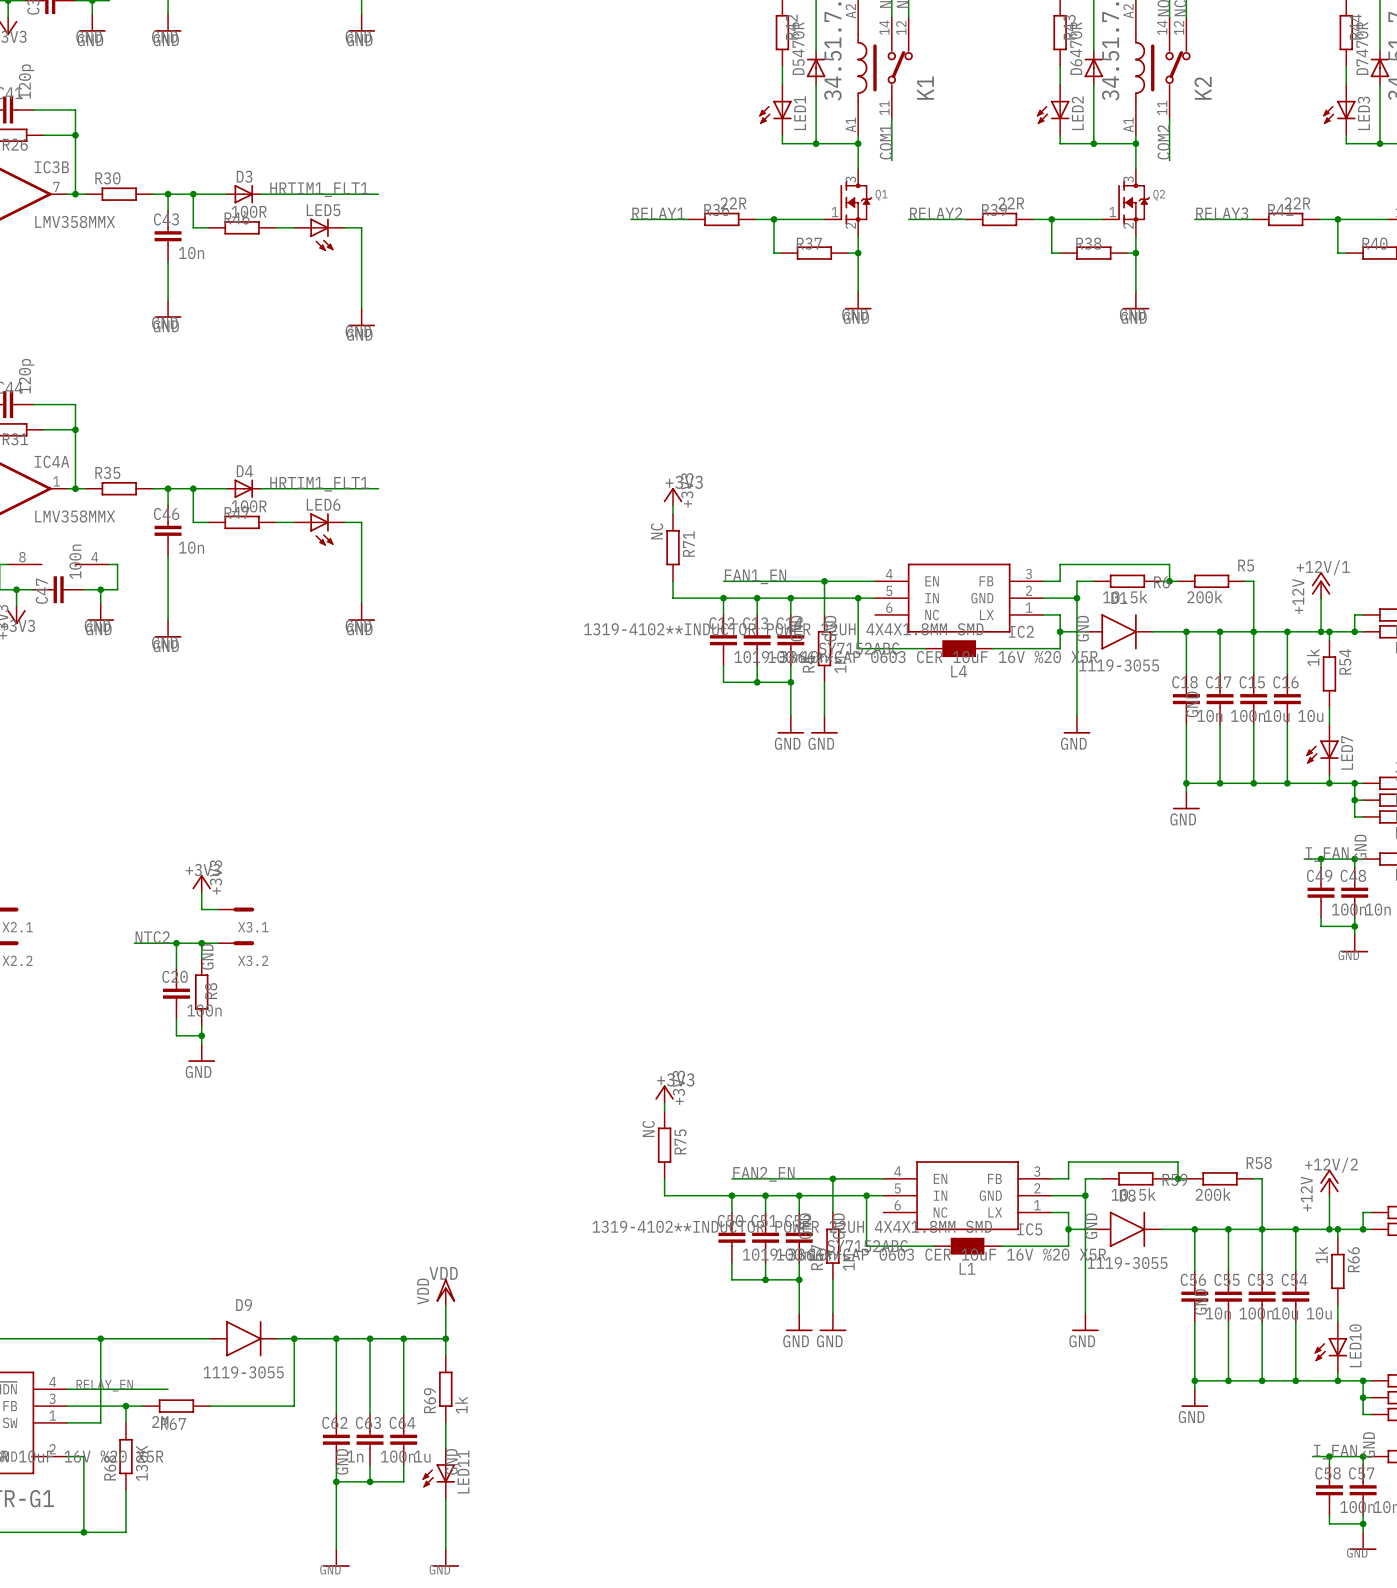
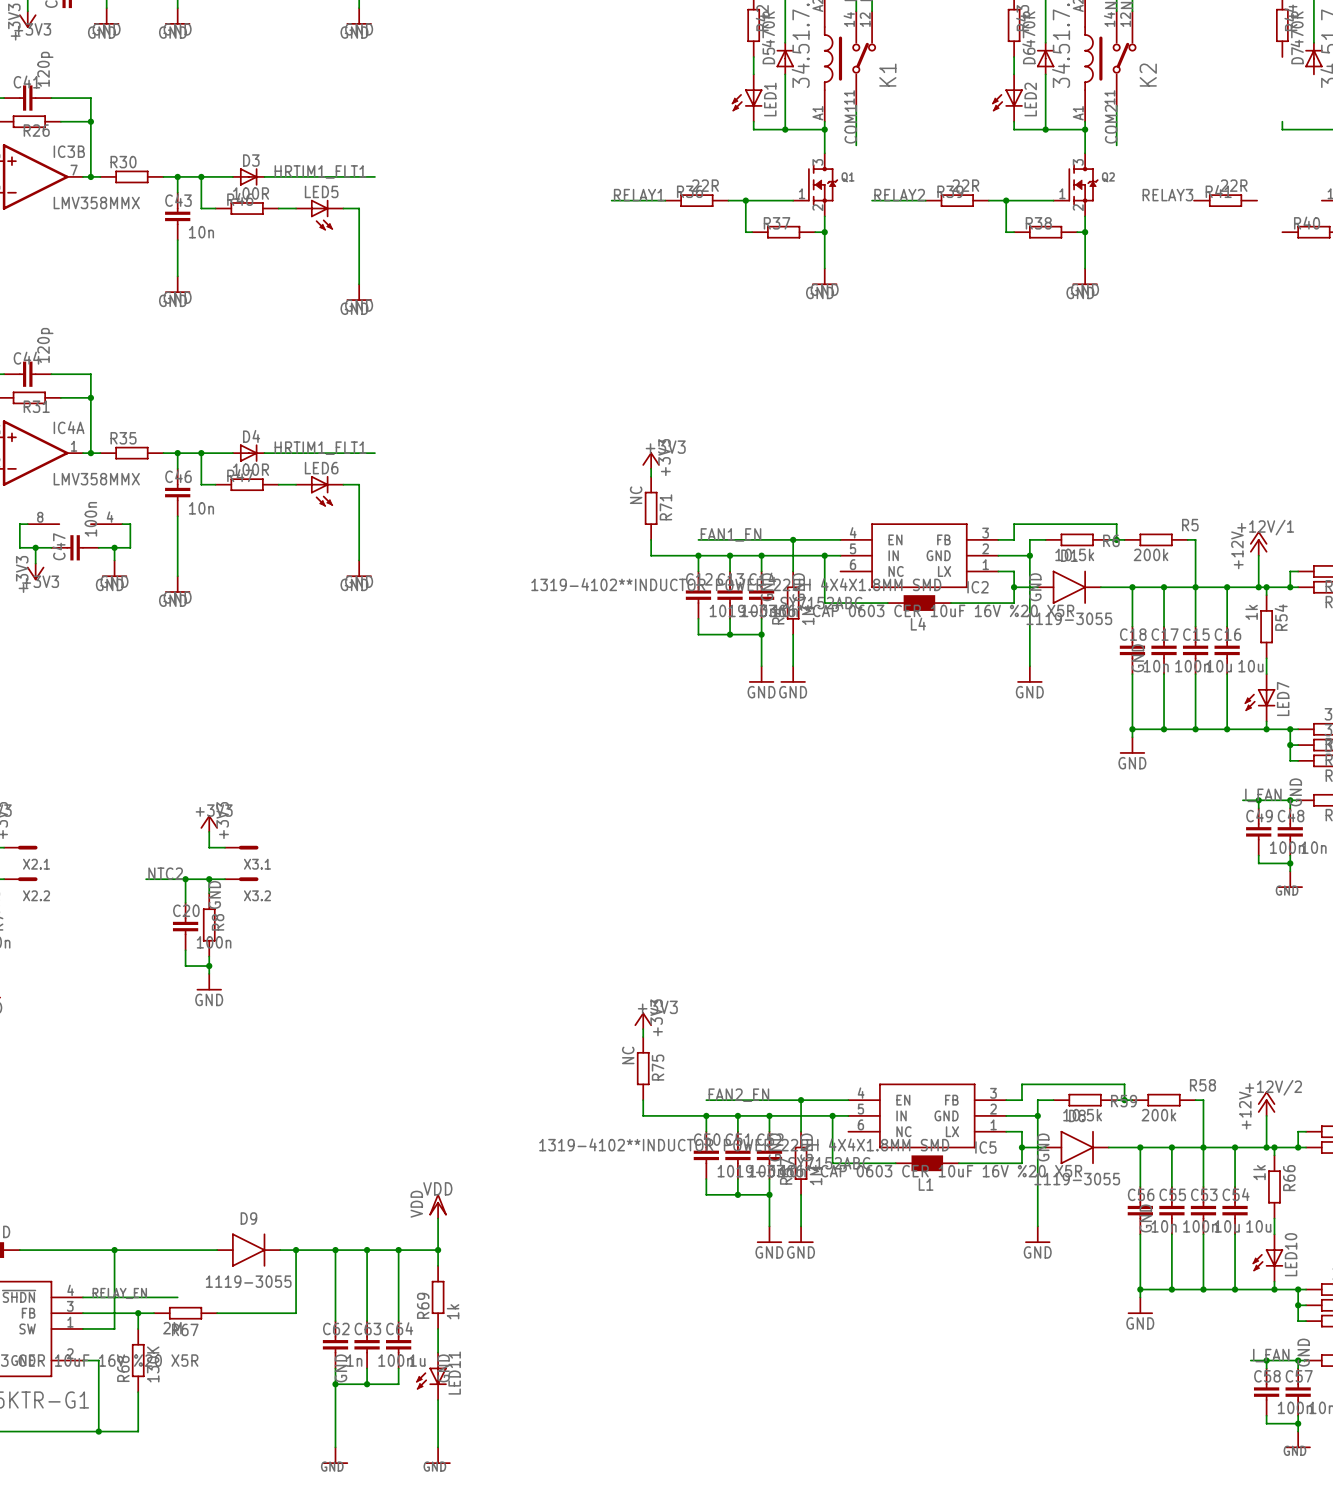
wire: (1346, 66) (1346, 84) -> none
wire: (1379, 84) (1379, 143) -> none
LED3: (1339, 110) -> none
junction: (1379, 143) -> none
wire: (1194, 219) (1252, 219) -> none
wire: (1319, 219) (1388, 219) -> none
wire: (1337, 219) (1337, 253) (1346, 253) -> none
junction: (1337, 219) -> none

